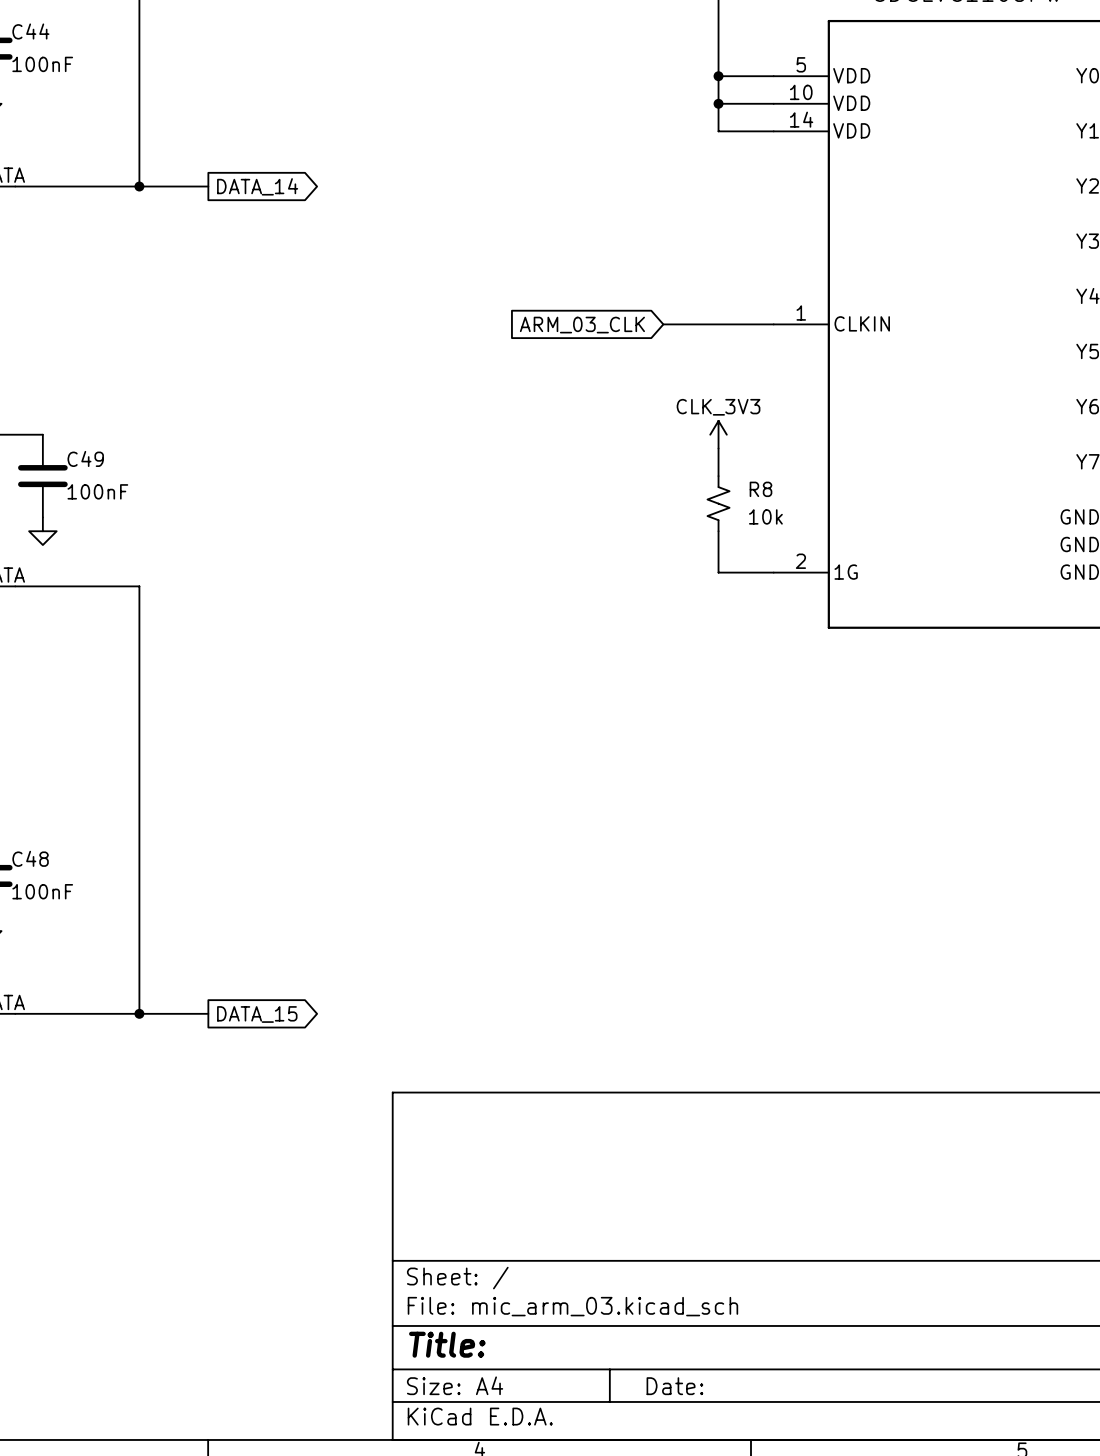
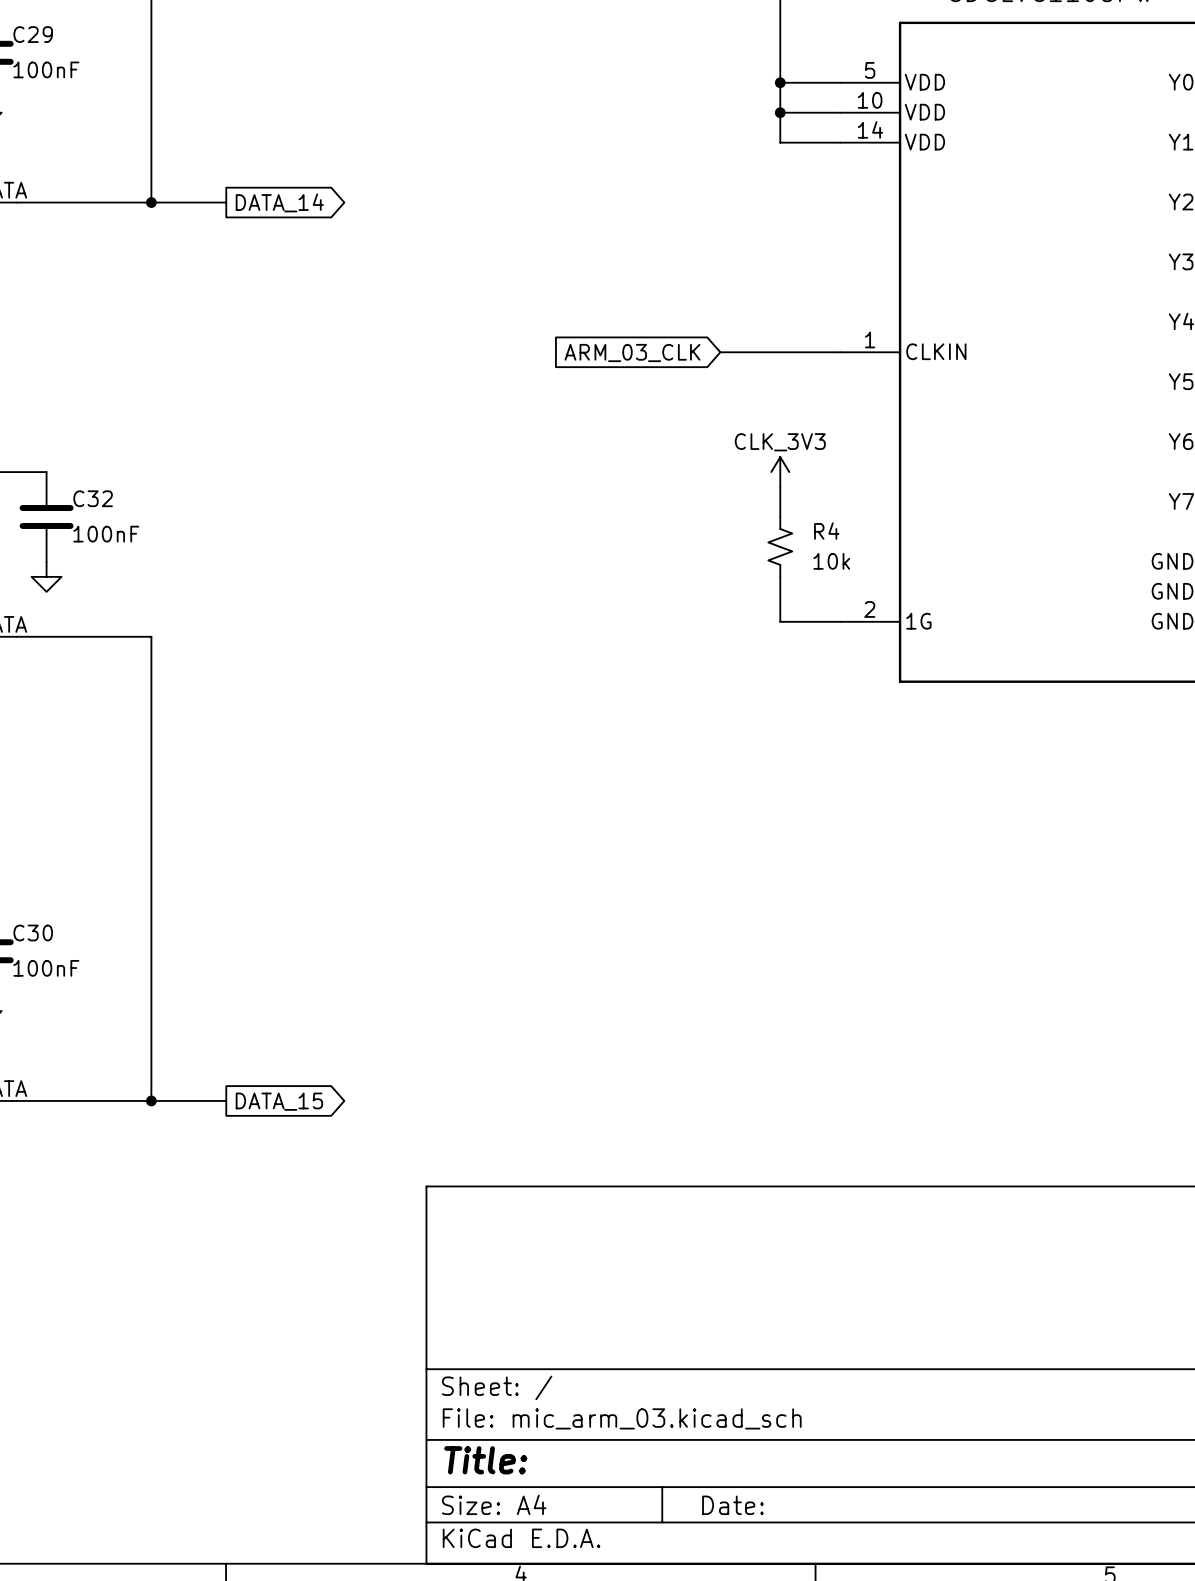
C44 name: C44 (30, 31) -> C29 (33, 34)
C49 name: C49 (85, 458) -> C32 (93, 498)
R8 name: R8 (760, 489) -> R4 (826, 531)
C48 name: C48 (30, 858) -> C30 (33, 932)

